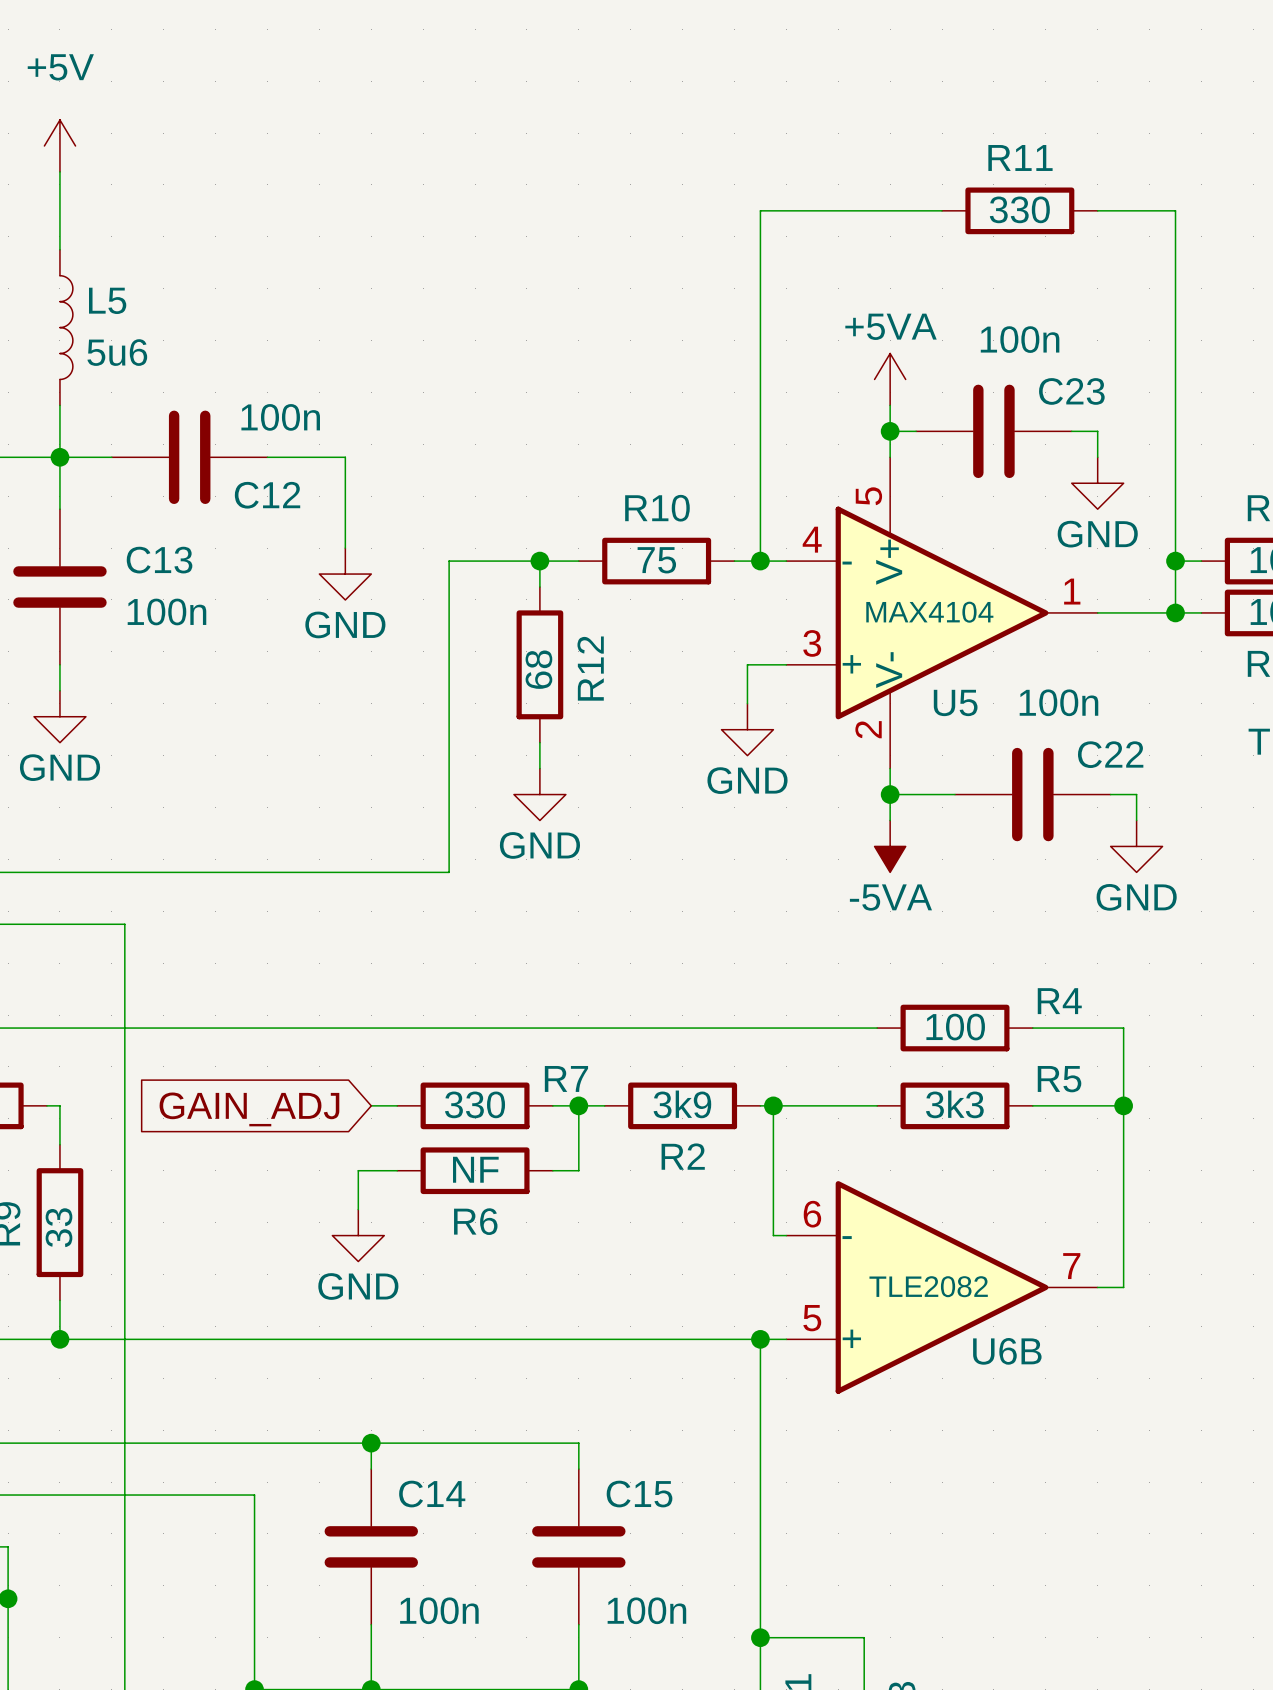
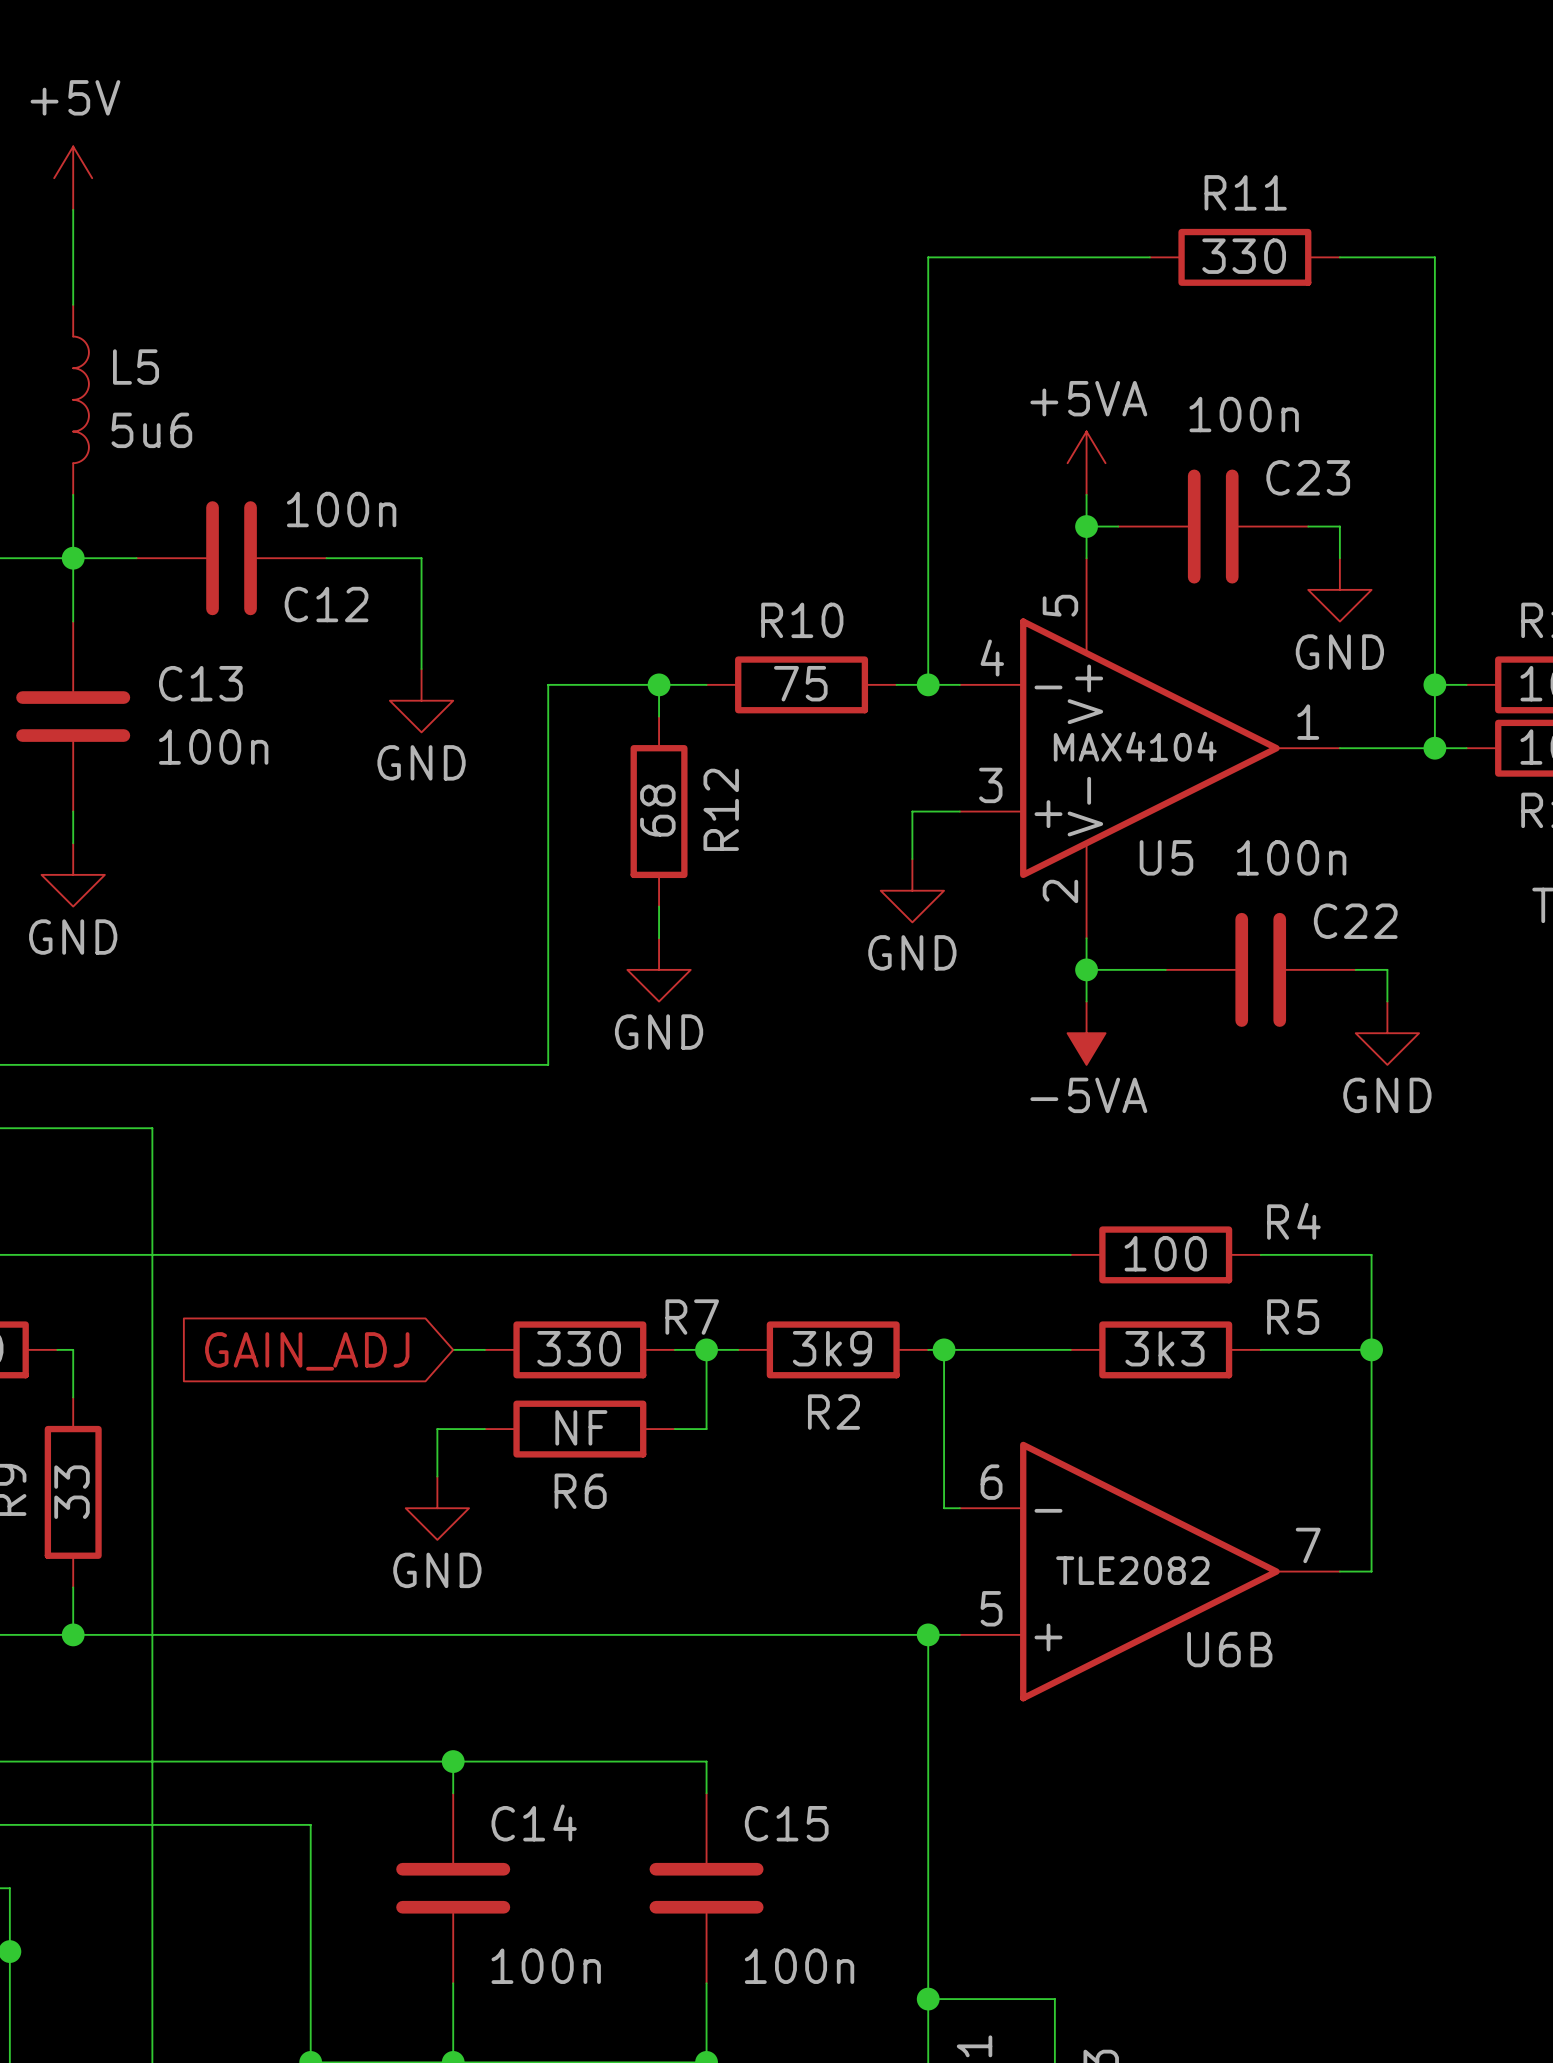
power symbol text position: +5V (60, 67) -> +5V (75, 97)

